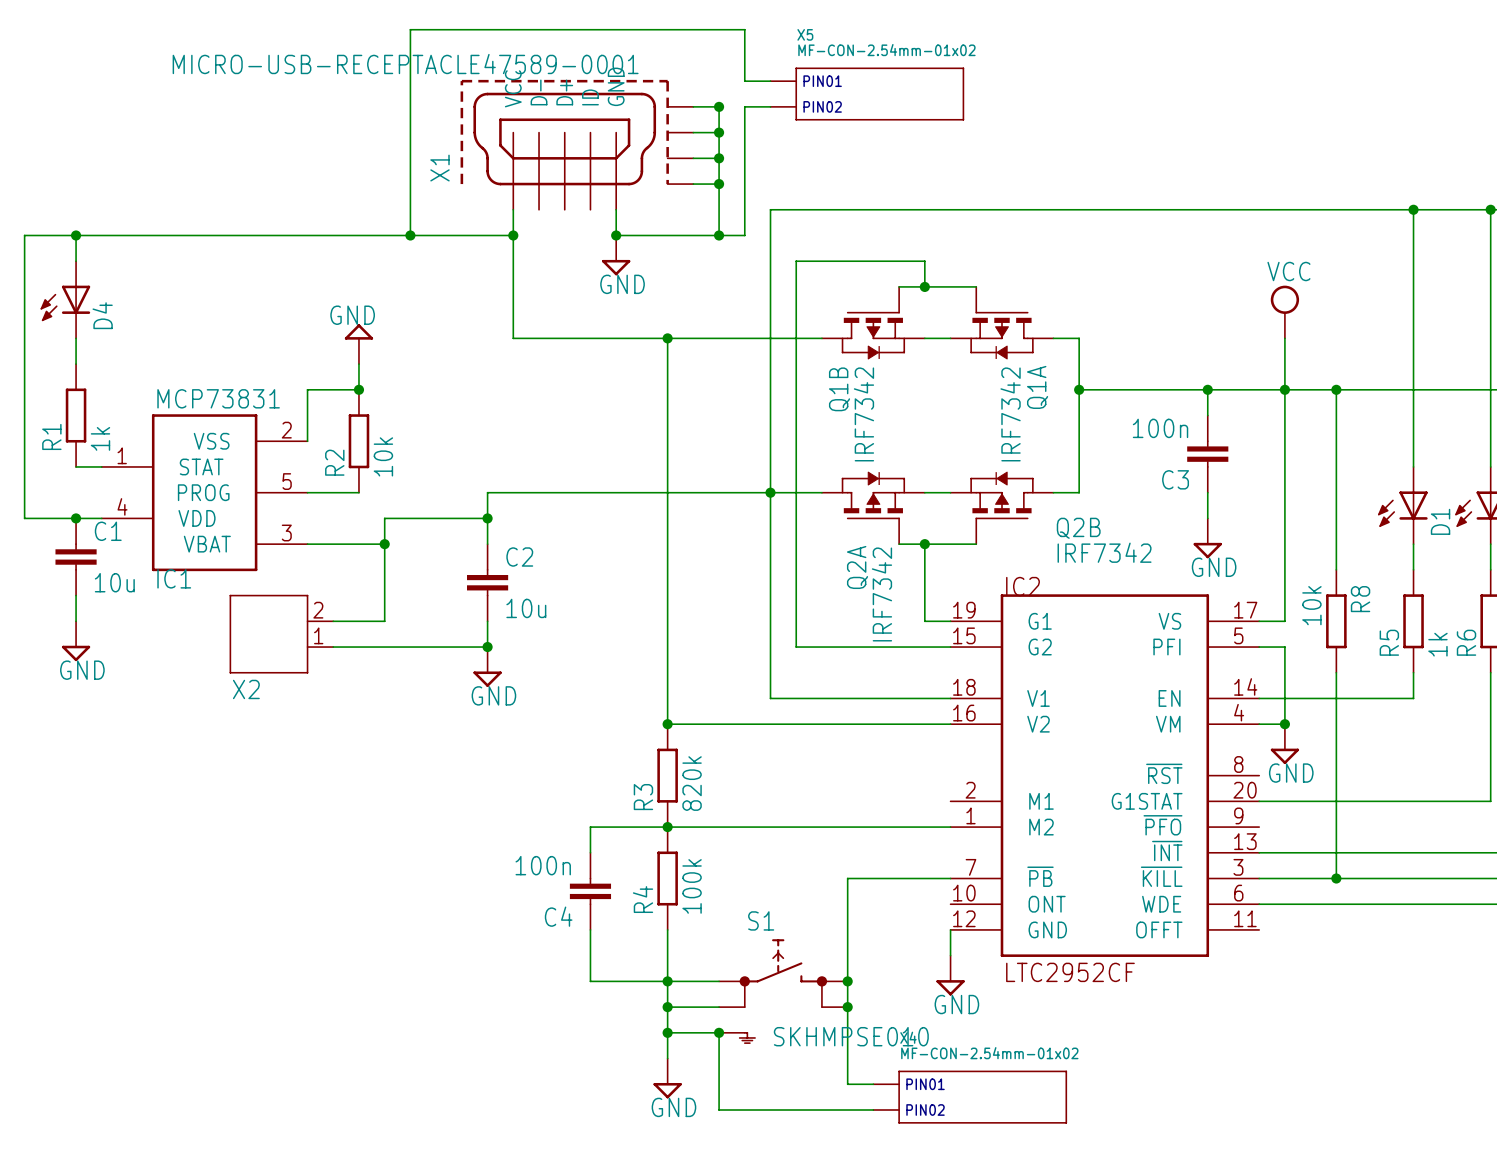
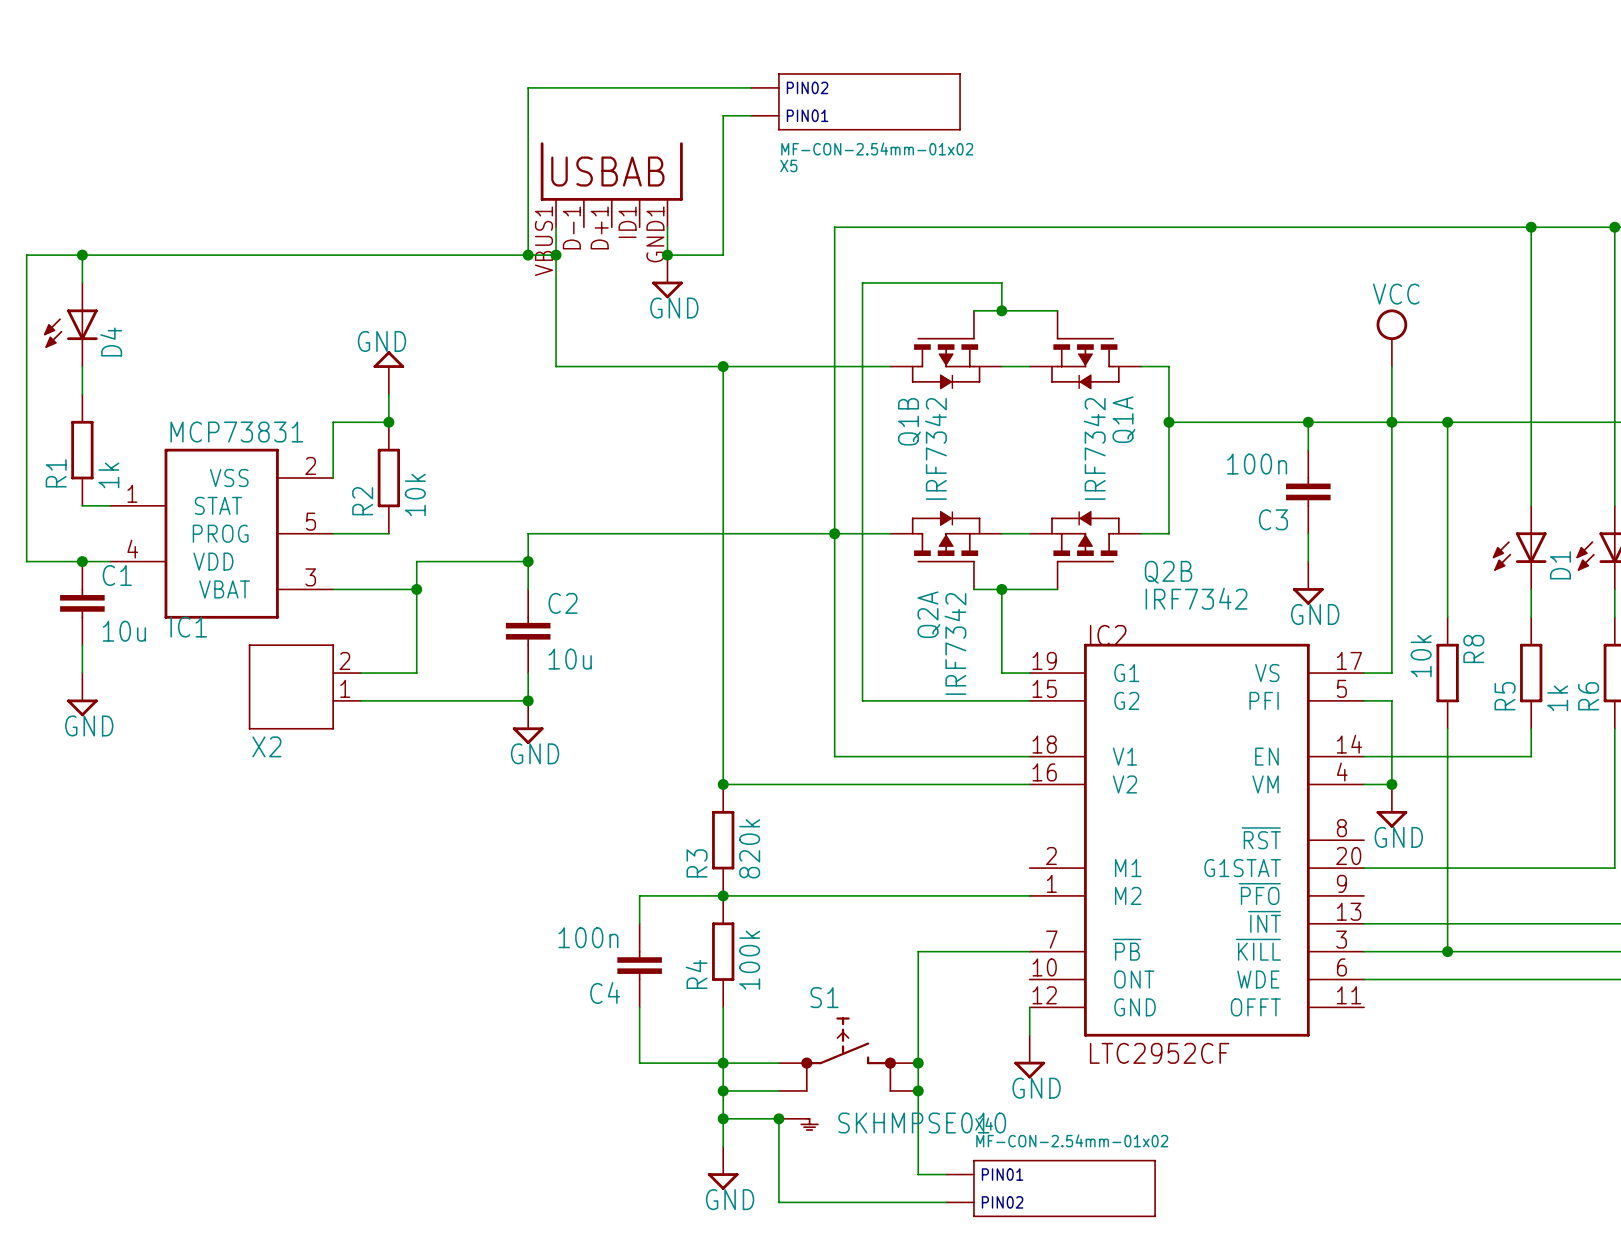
X5 name position: X5 (805, 34) -> X5 (788, 165)
X5 value position: MF-CON-2.54mm-01x02 (886, 50) -> MF-CON-2.54mm-01x02 (877, 148)
wire: none -> (751, 87) (528, 87) (528, 255)
wire: (770, 81) (744, 81) (744, 29) (410, 29) (410, 235) -> none
X5 text: PIN01 (822, 81) -> PIN02 (807, 87)
X5 position: (867, 94) -> (855, 101)
wire: (693, 106) (719, 106) (719, 235) -> (751, 115) (723, 115) (723, 255)
junction: (719, 106) -> none
wire: (770, 106) (744, 106) (744, 235) (667, 235) -> none
X5 text: PIN02 (822, 106) -> PIN01 (807, 115)
wire: (693, 132) (719, 132) -> none
junction: (719, 132) -> none
X1: MICRO-USB-RECEPTACLE47589-0001 (576, 144) -> none
wire: (693, 158) (719, 158) -> none
junction: (719, 158) -> none
part: none -> (611, 184)
wire: (693, 184) (719, 184) -> none
junction: (719, 184) -> none
junction: (410, 235) -> none
junction: none -> (528, 255)
junction: (719, 235) -> none

